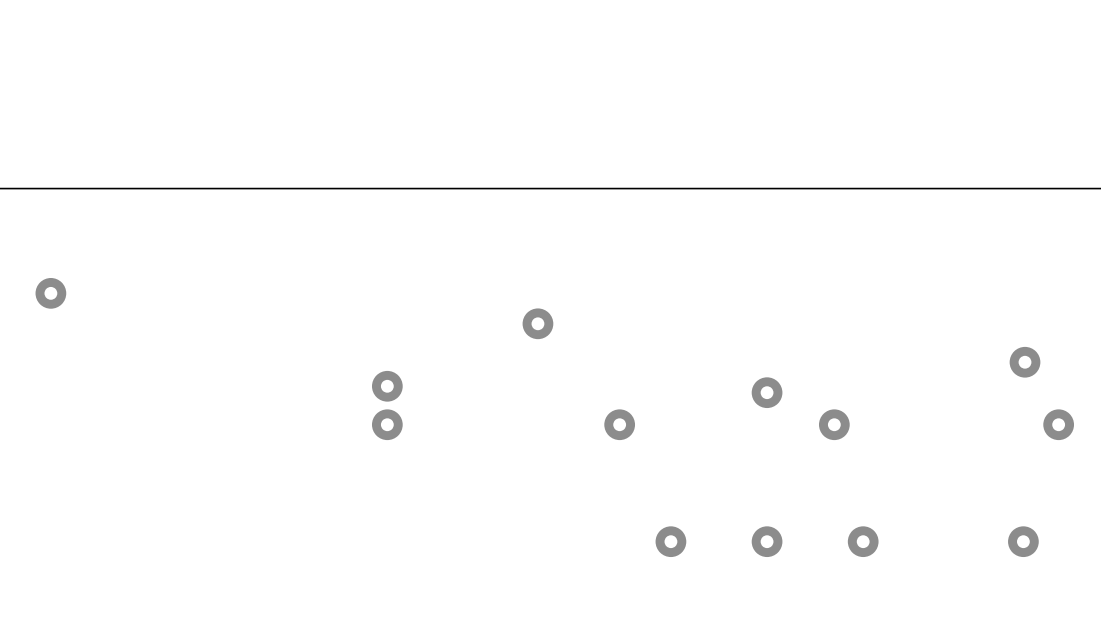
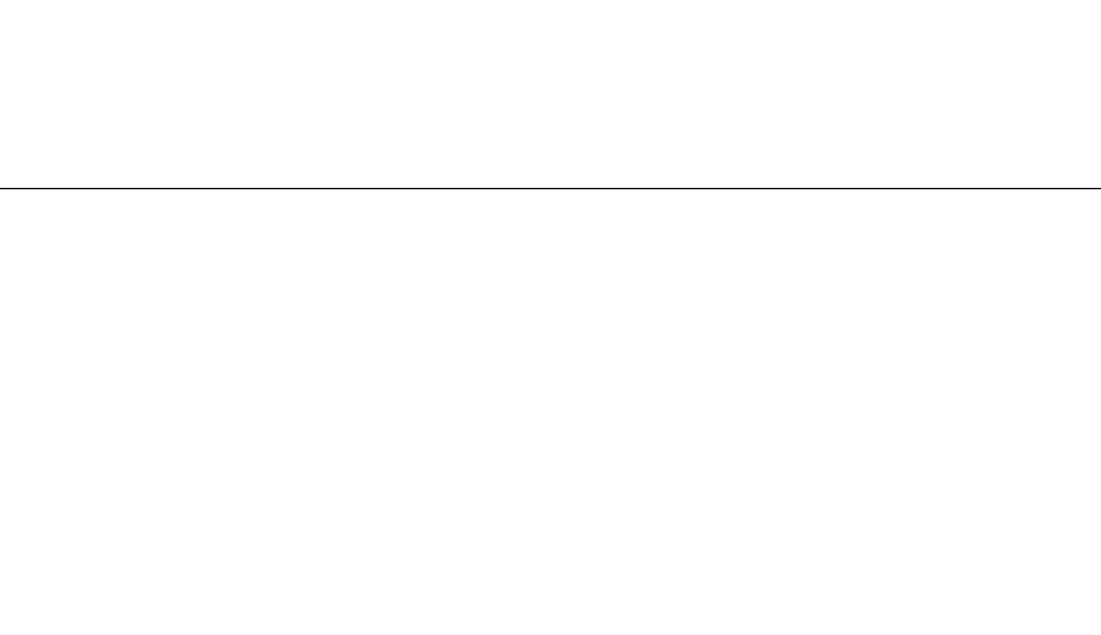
via: (50, 293) -> none
via: (537, 323) -> none
via: (1025, 362) -> none
via: (387, 386) -> none
via: (767, 392) -> none
via: (387, 424) -> none
via: (619, 424) -> none
via: (834, 424) -> none
via: (1058, 424) -> none
via: (670, 541) -> none
via: (767, 541) -> none
via: (863, 541) -> none
via: (1023, 541) -> none

